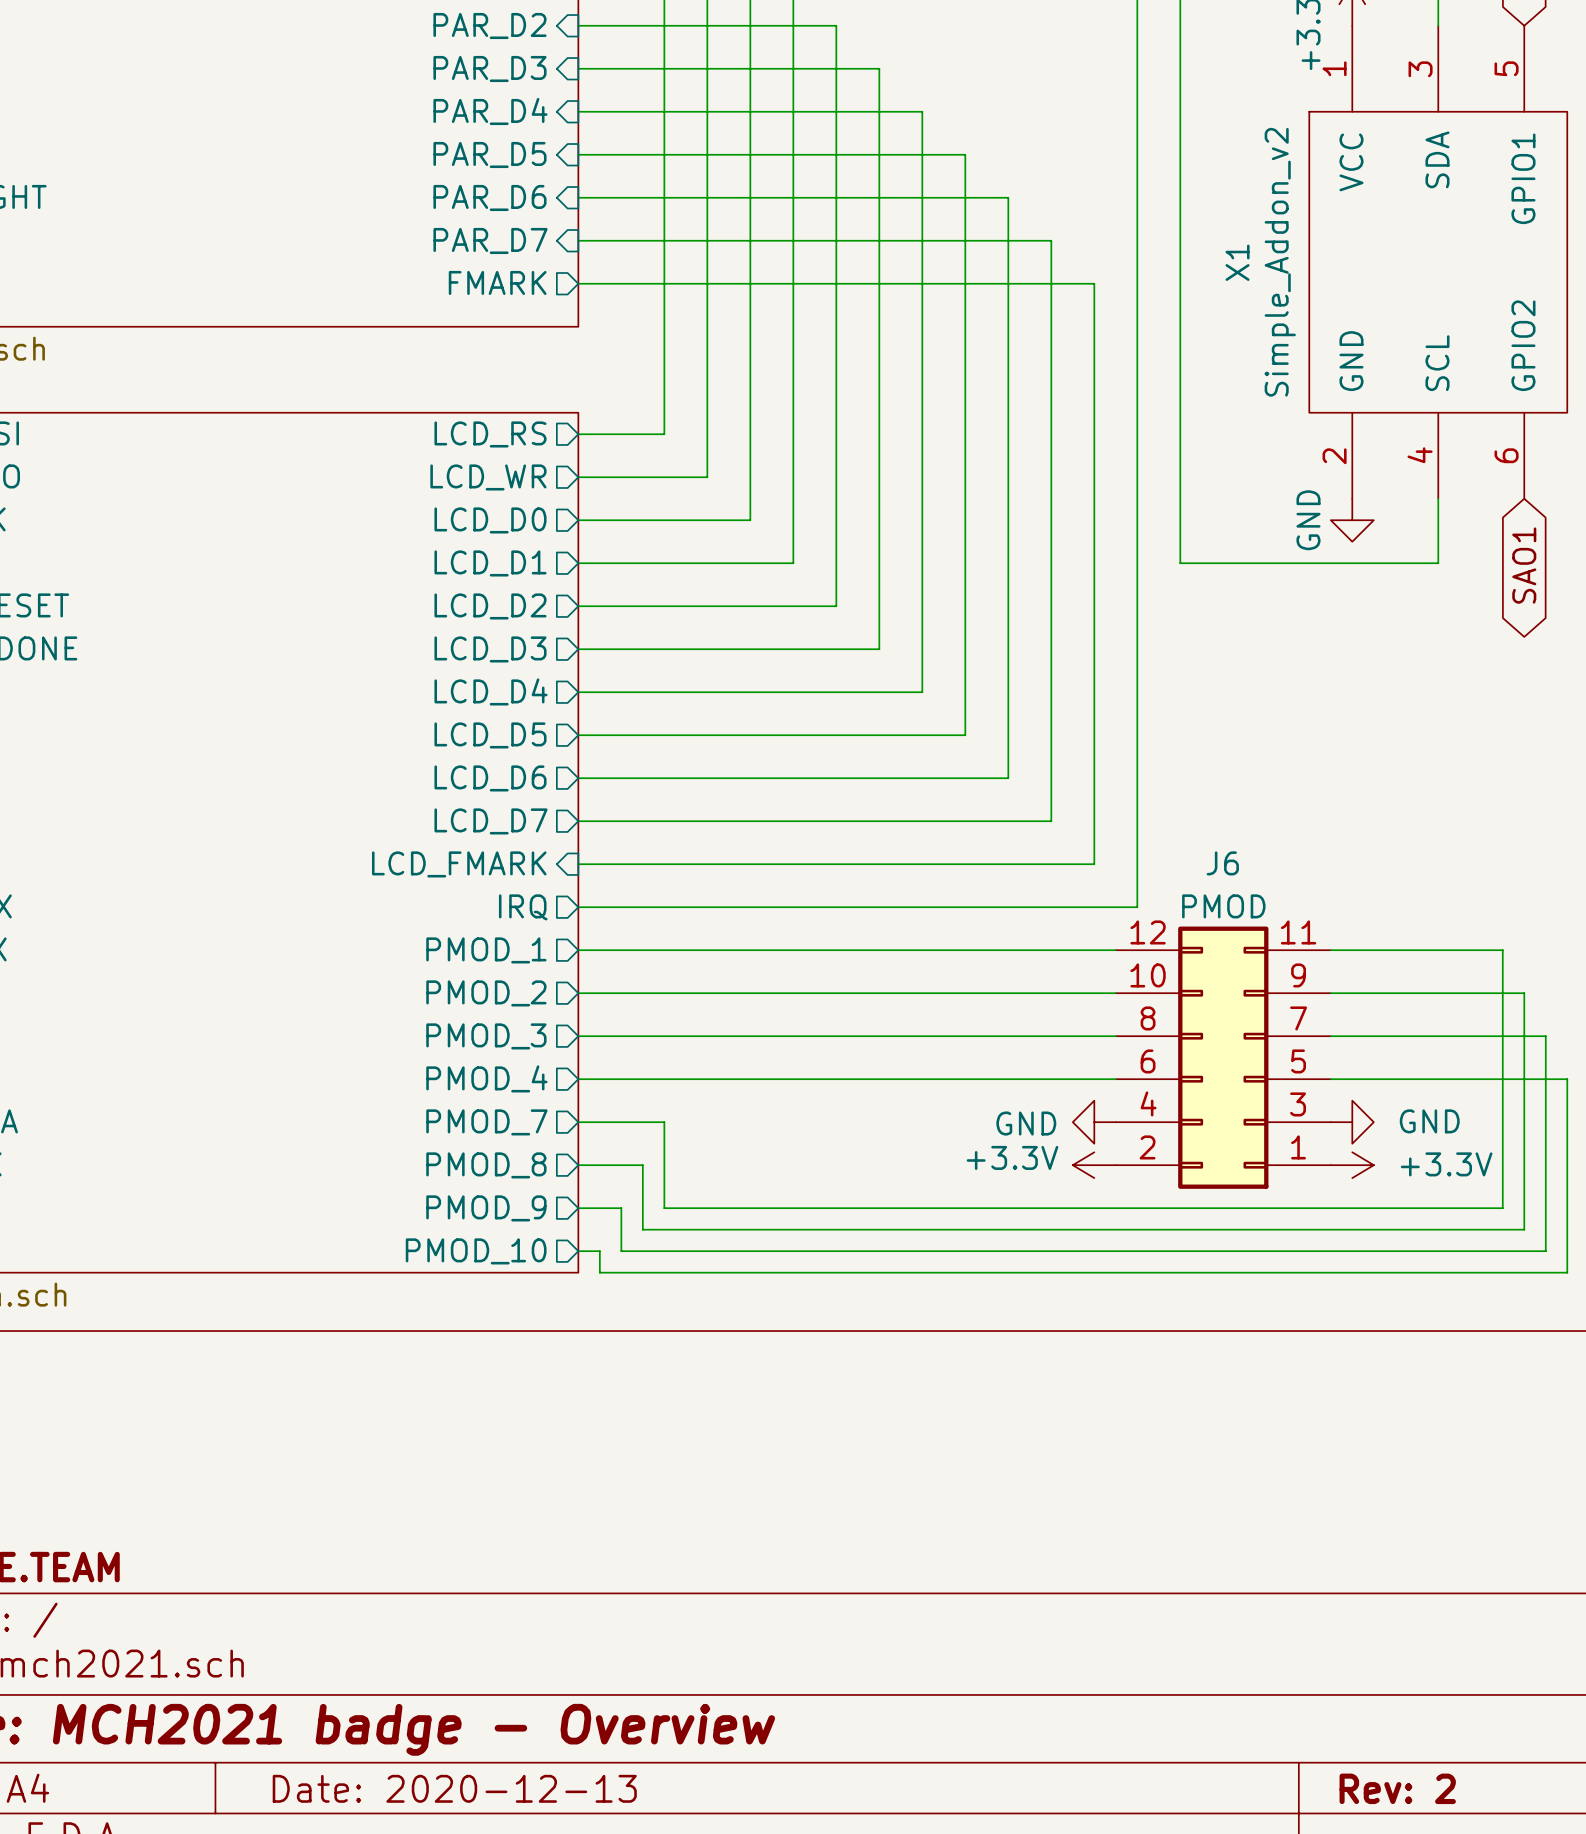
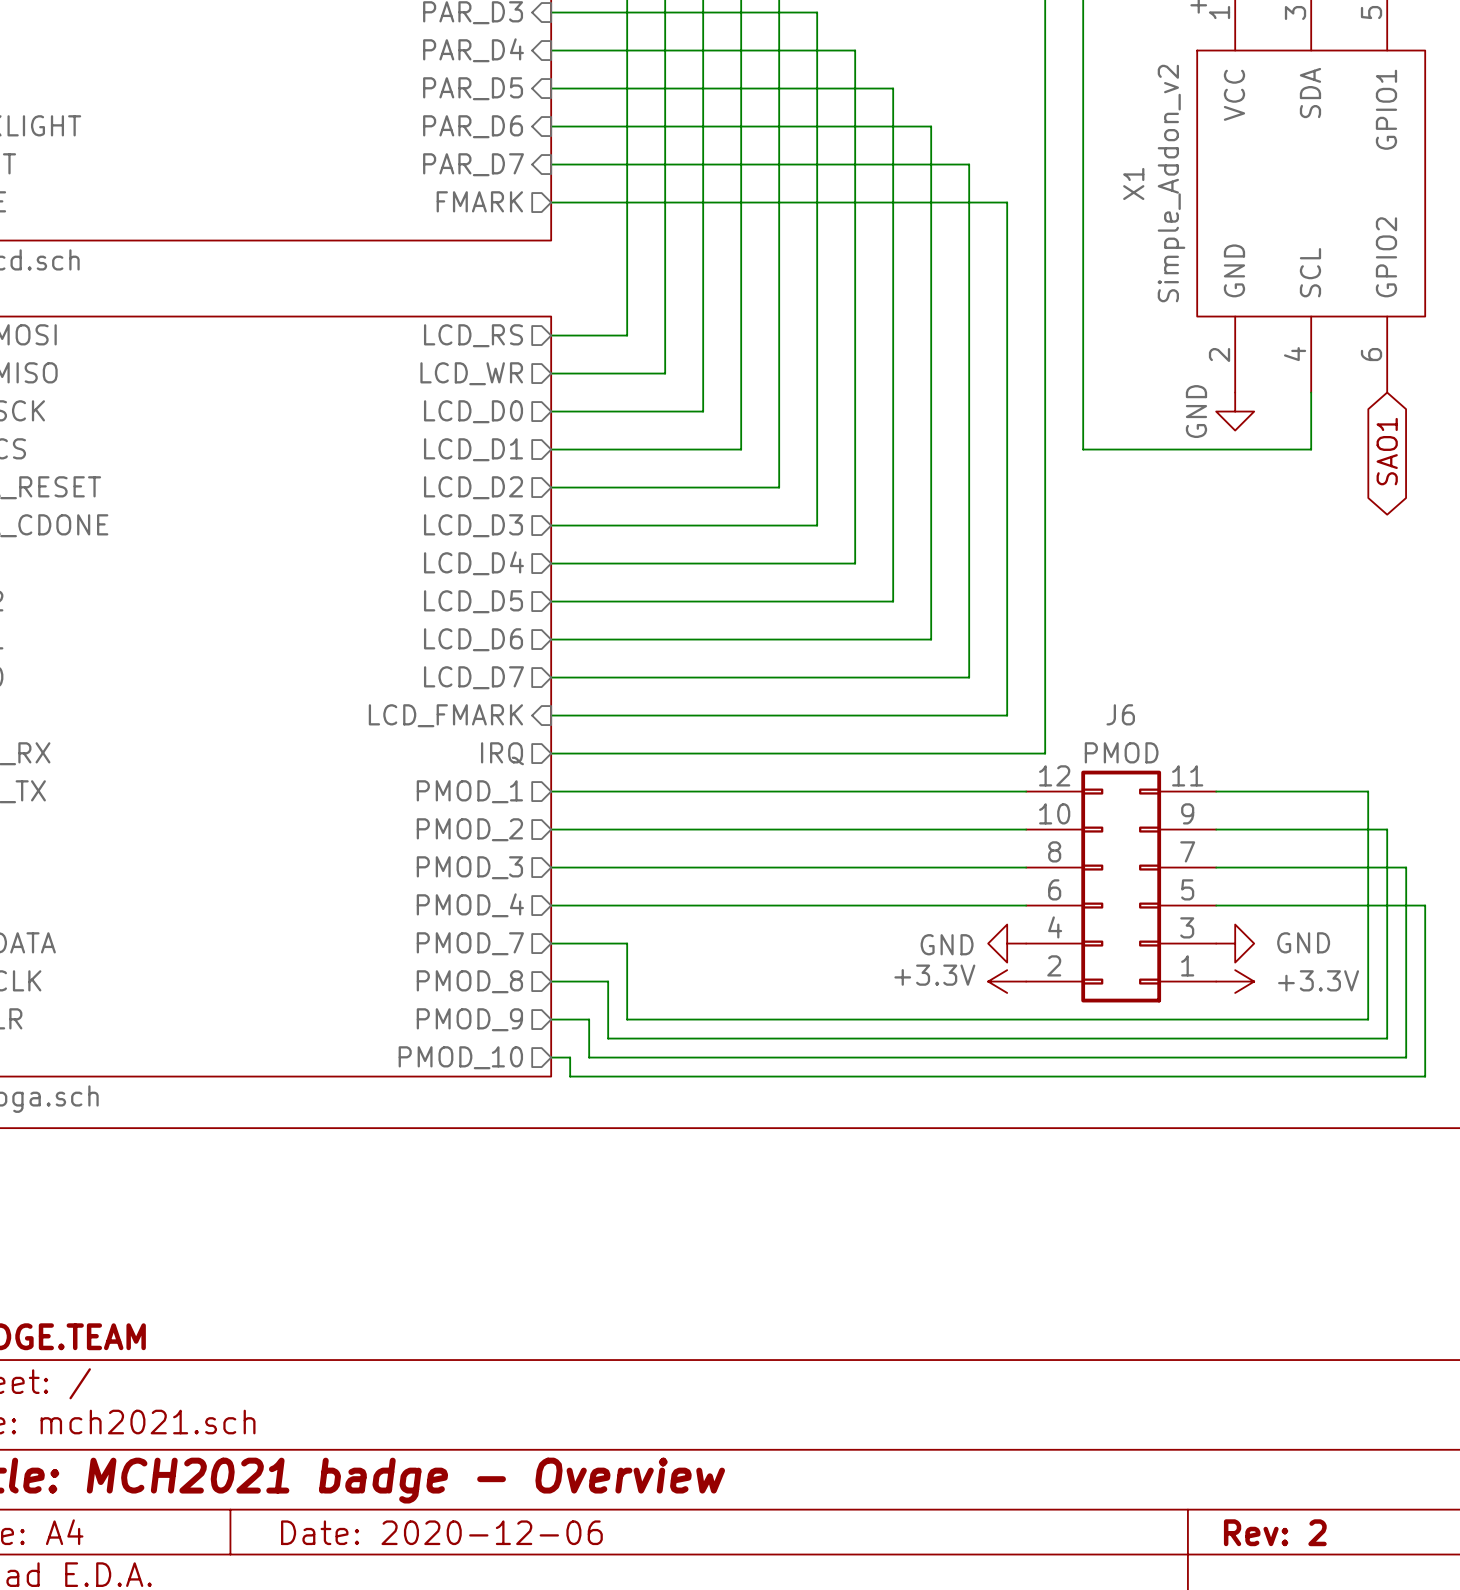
title block: Date: 2020-12-13 (454, 1788) -> Date: 2020-12-06 (441, 1532)

